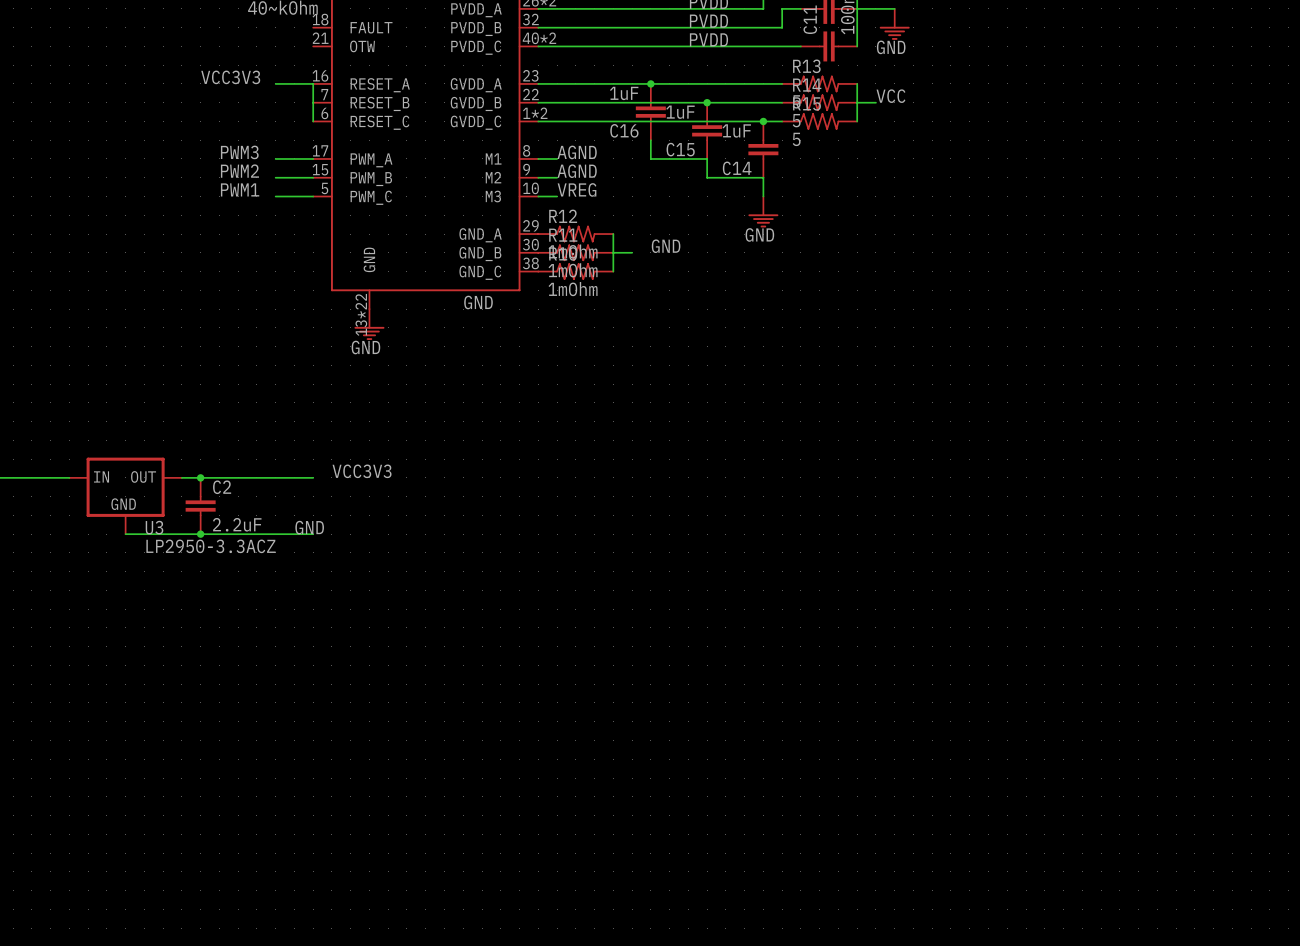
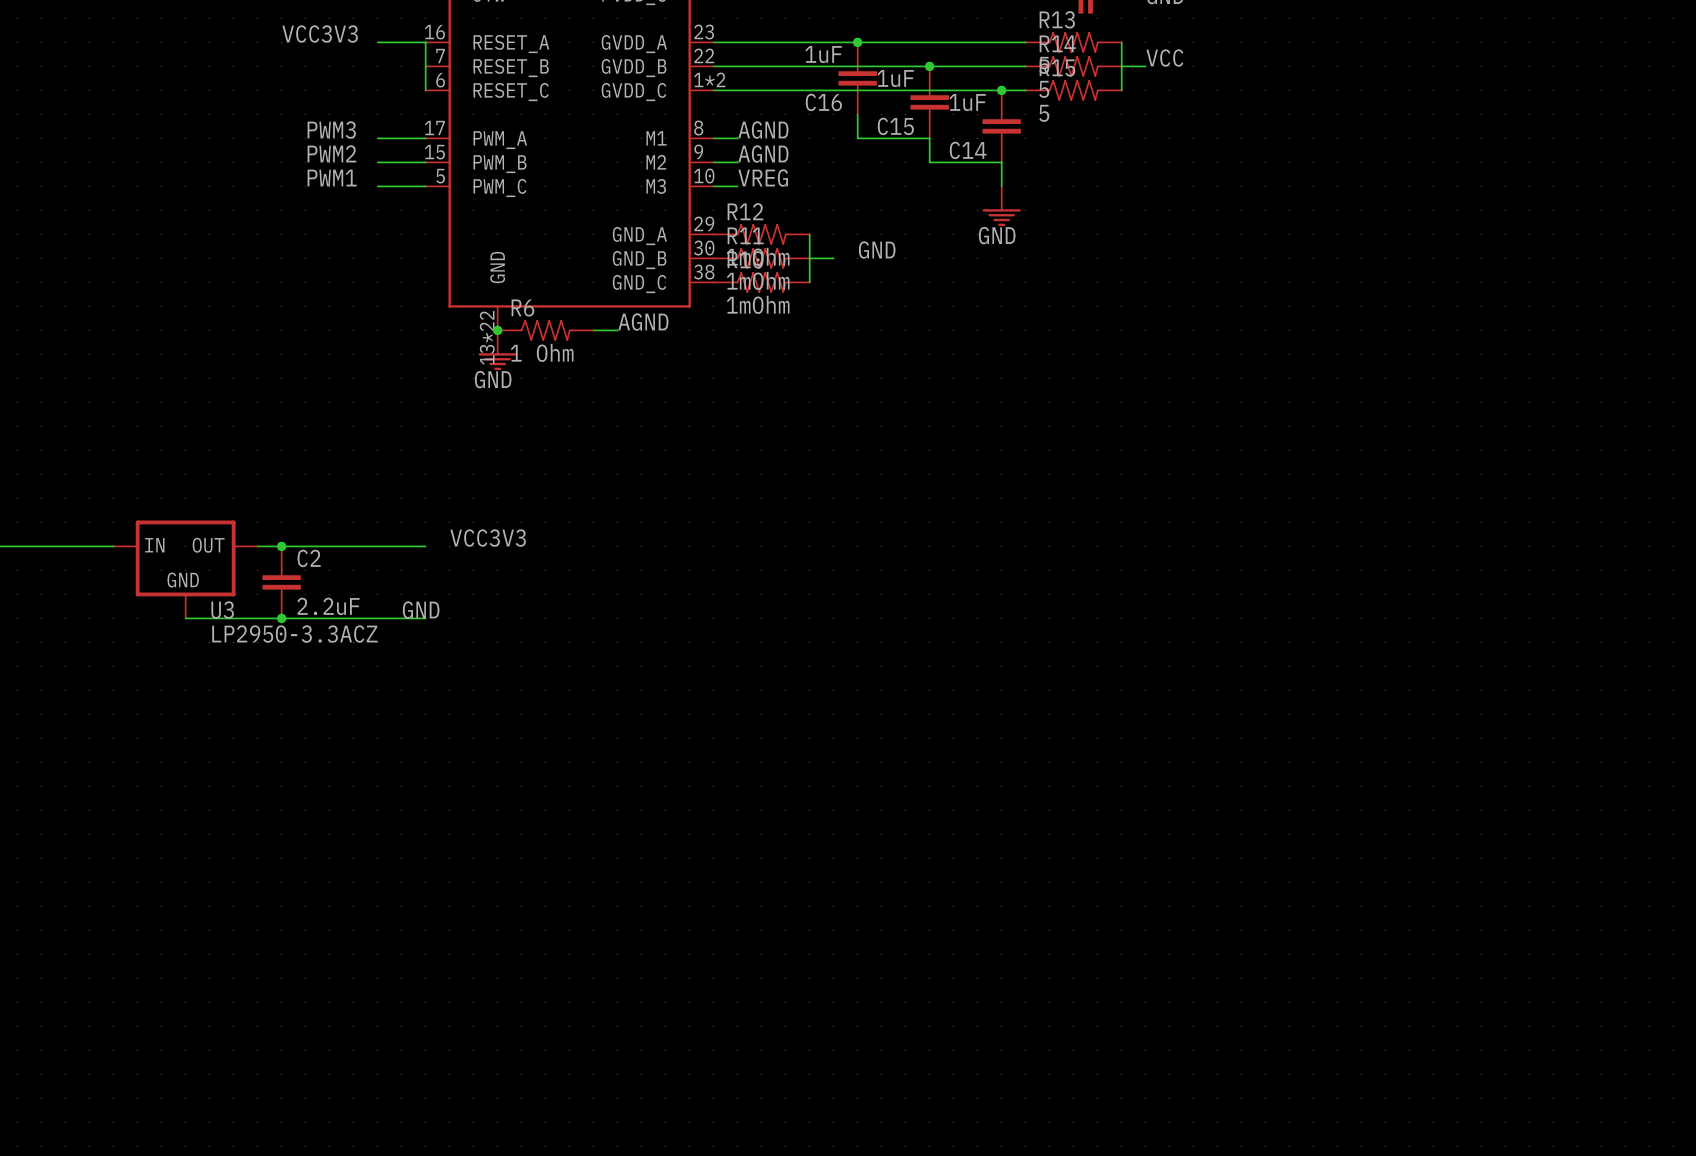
label: GND (478, 302) -> AGND (643, 322)
junction: none -> (497, 330)
R6: none -> 1 Ohm (545, 330)
wire: none -> (593, 330) (617, 330)

